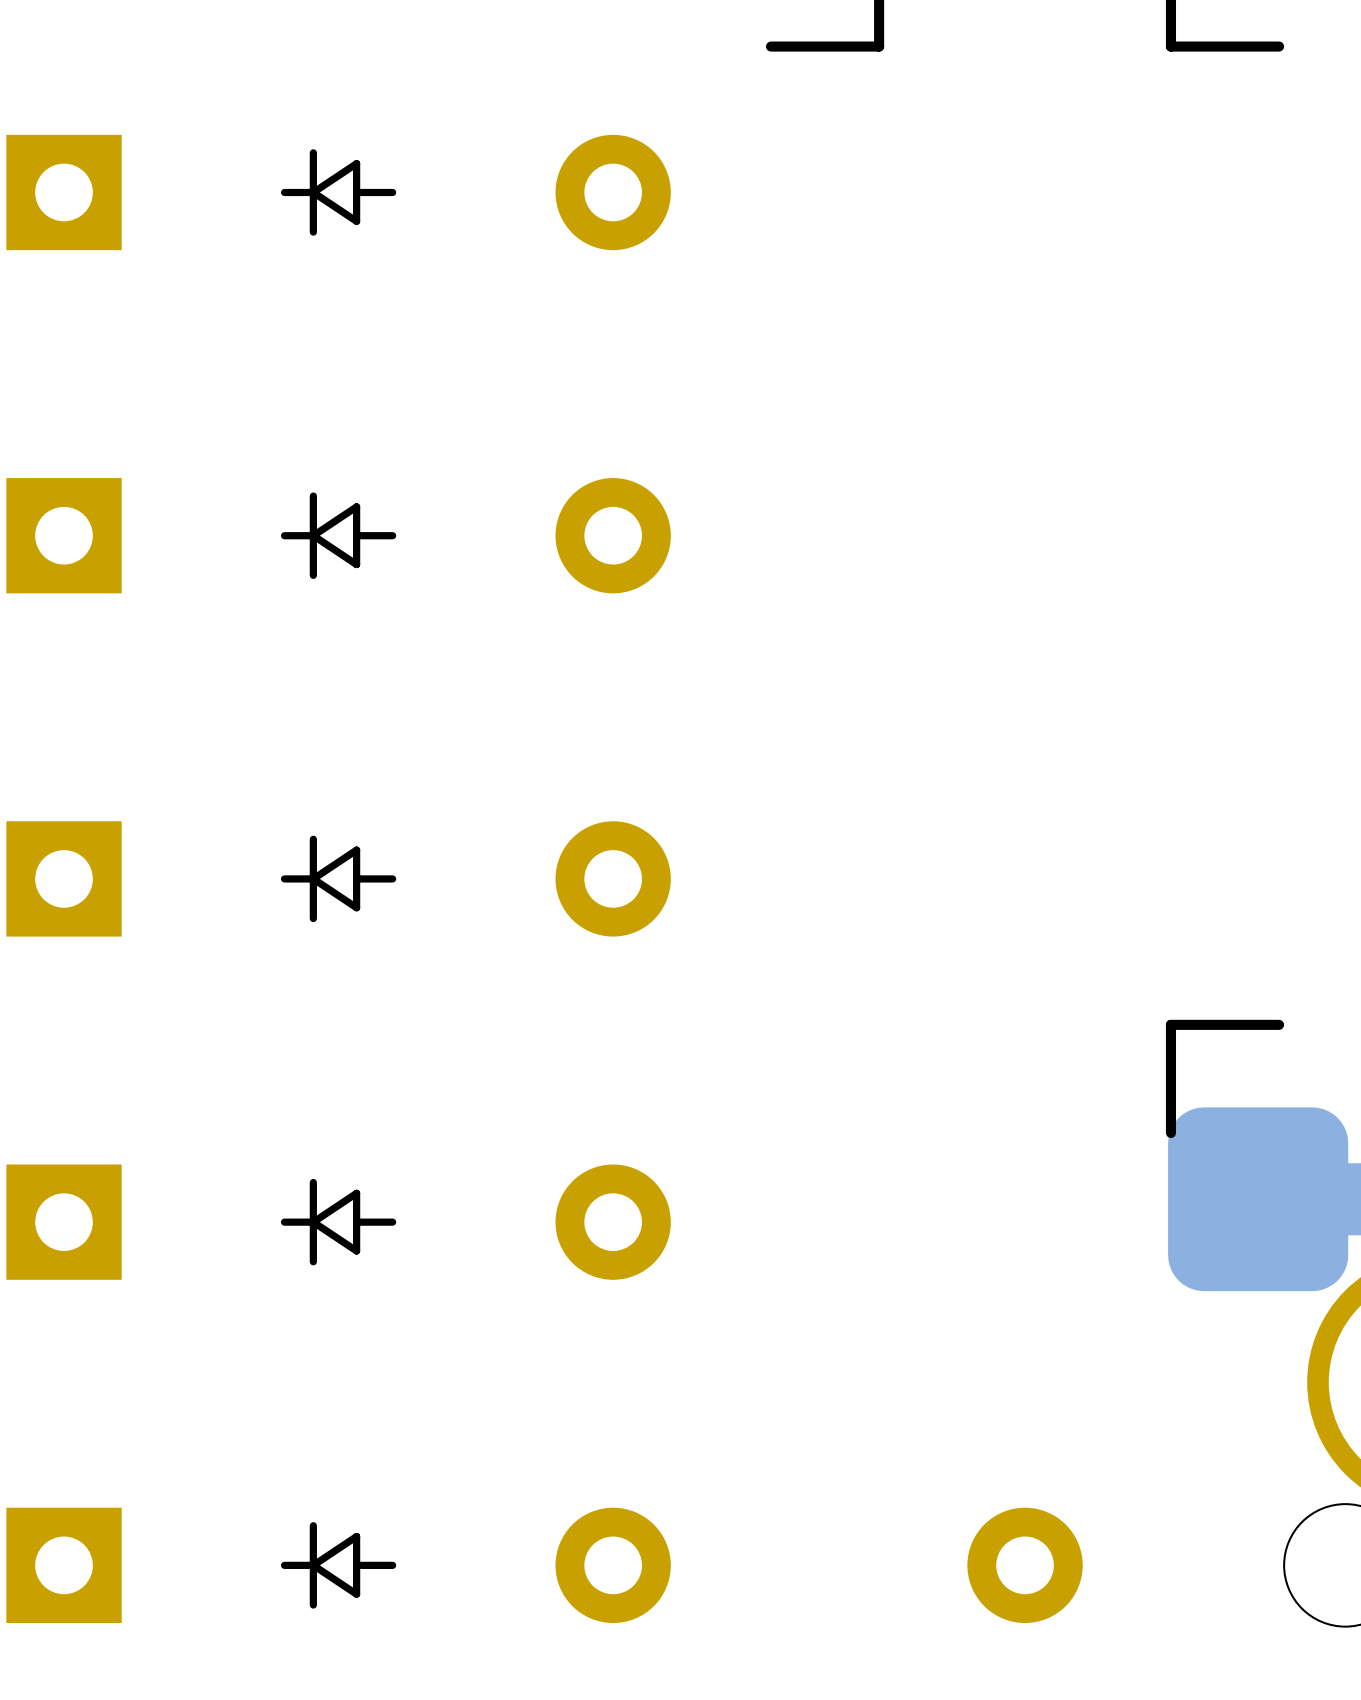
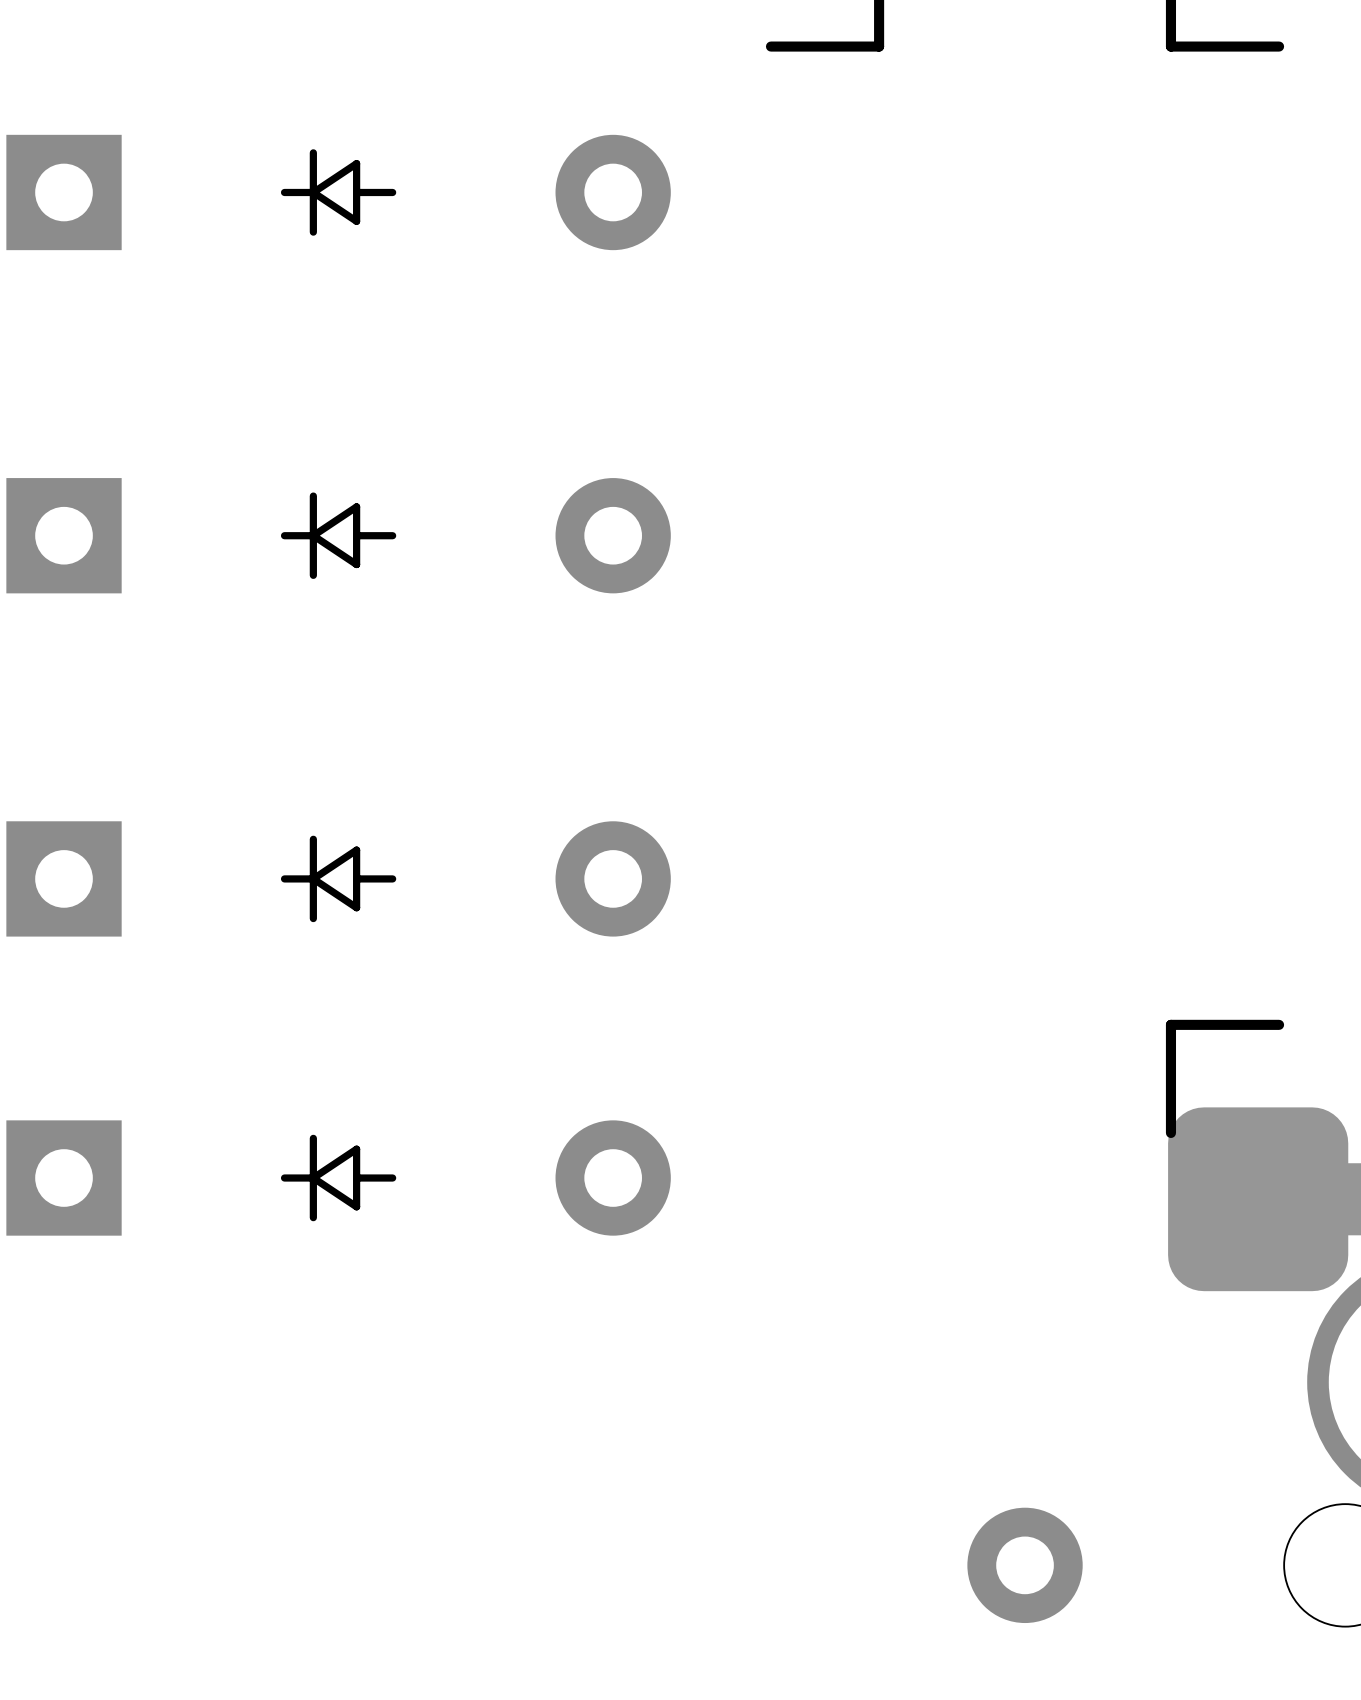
part position: (338, 1222) -> (338, 1178)
part: (338, 1565) -> none

